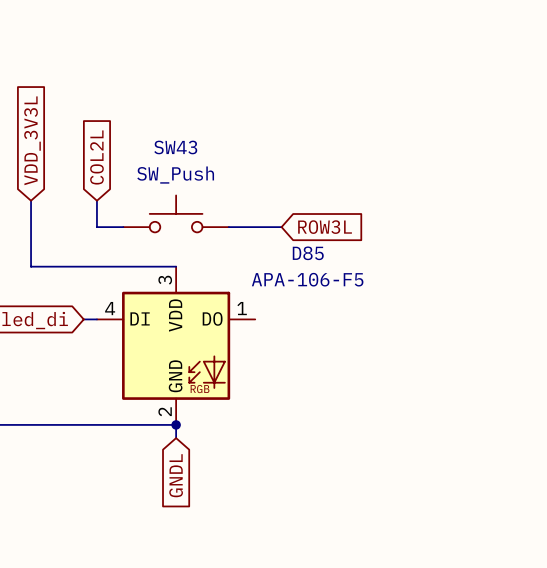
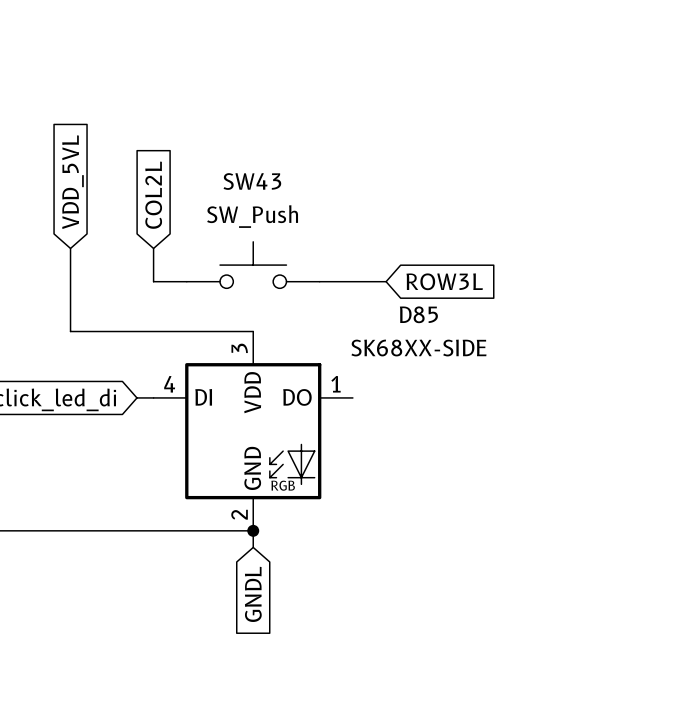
global label: VDD_3V3L (32, 140) -> VDD_5VL (73, 182)
D85 value: APA-106-F5 (307, 279) -> SK68XX-SIDE (418, 348)

